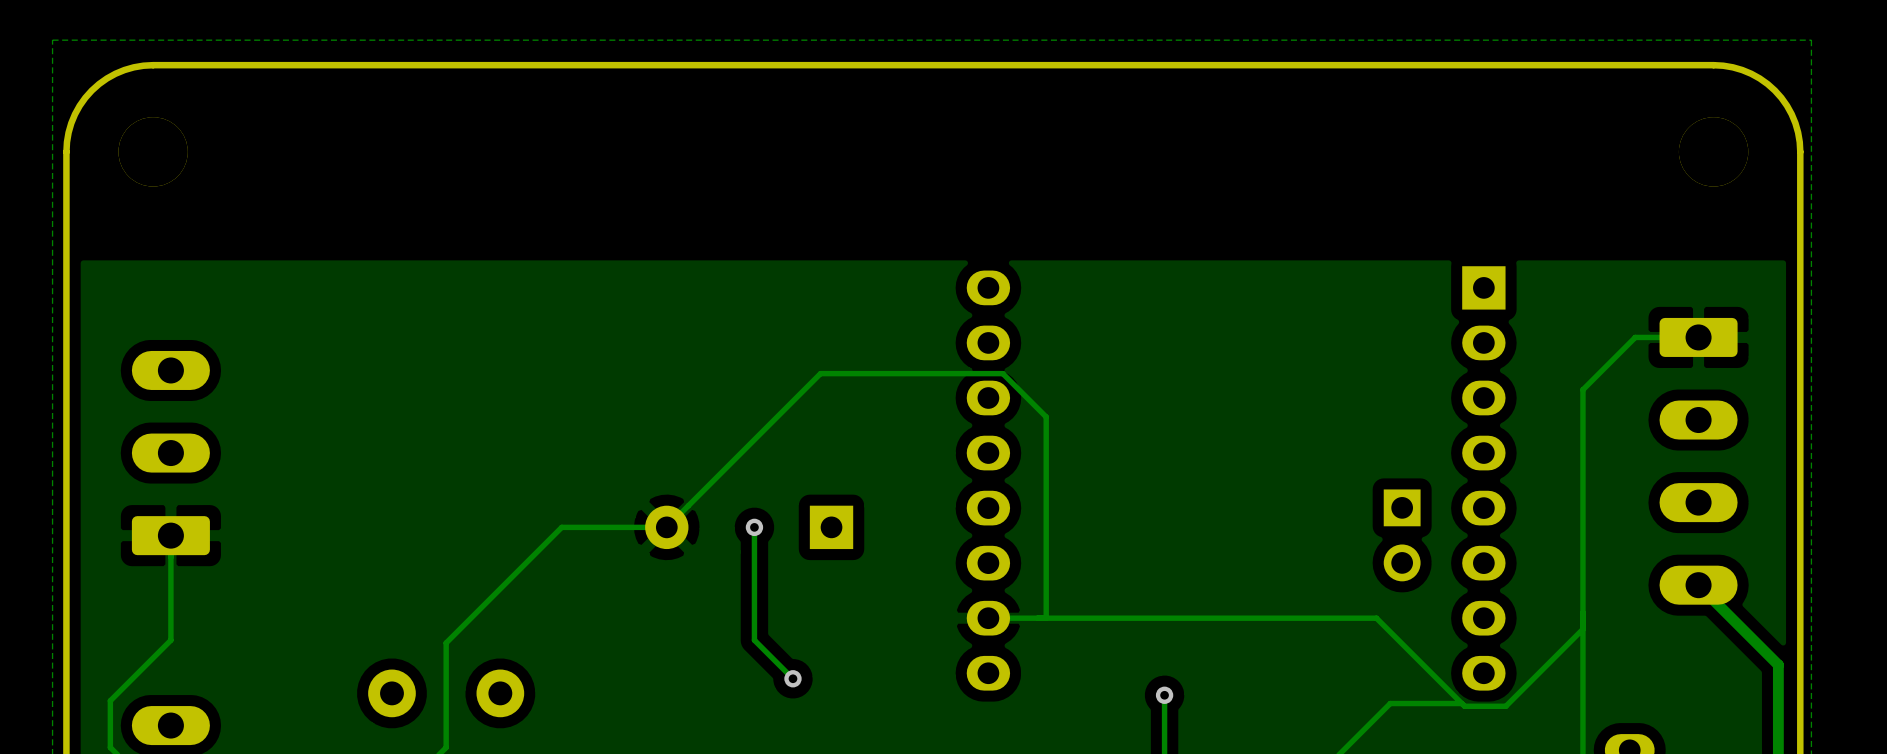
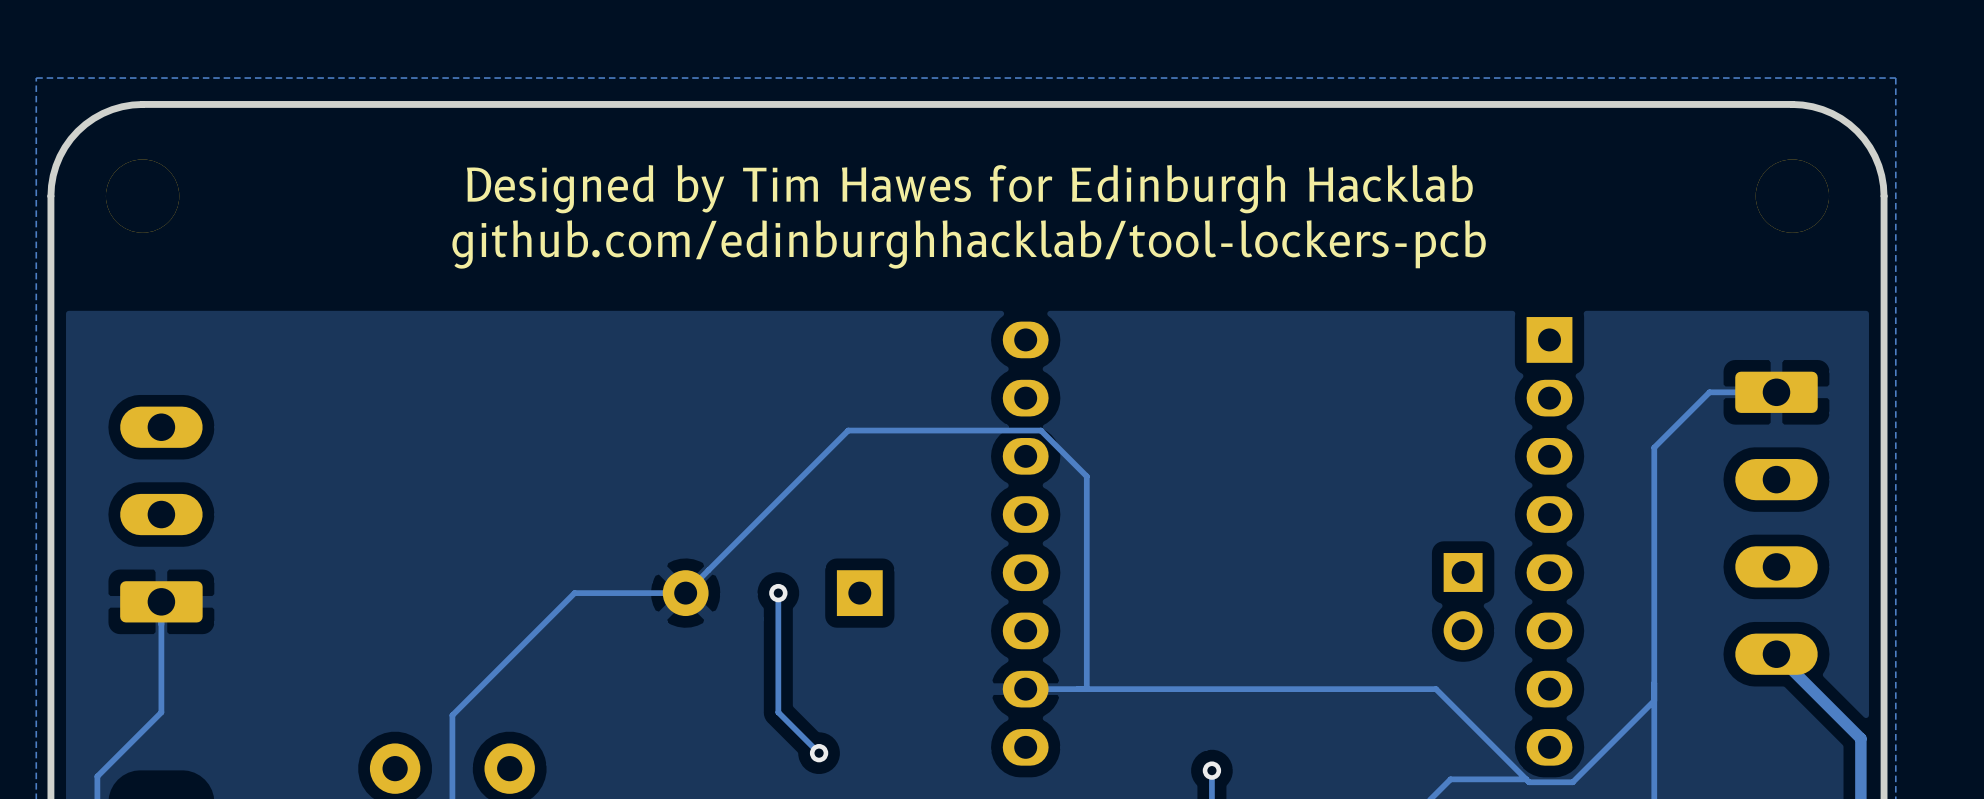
text: none -> Designed by Tim Hawes for Edinburgh Hacklab (969, 189)
text: none -> github.com/edinburghhacklab/tool-lockers-pcb (969, 244)

